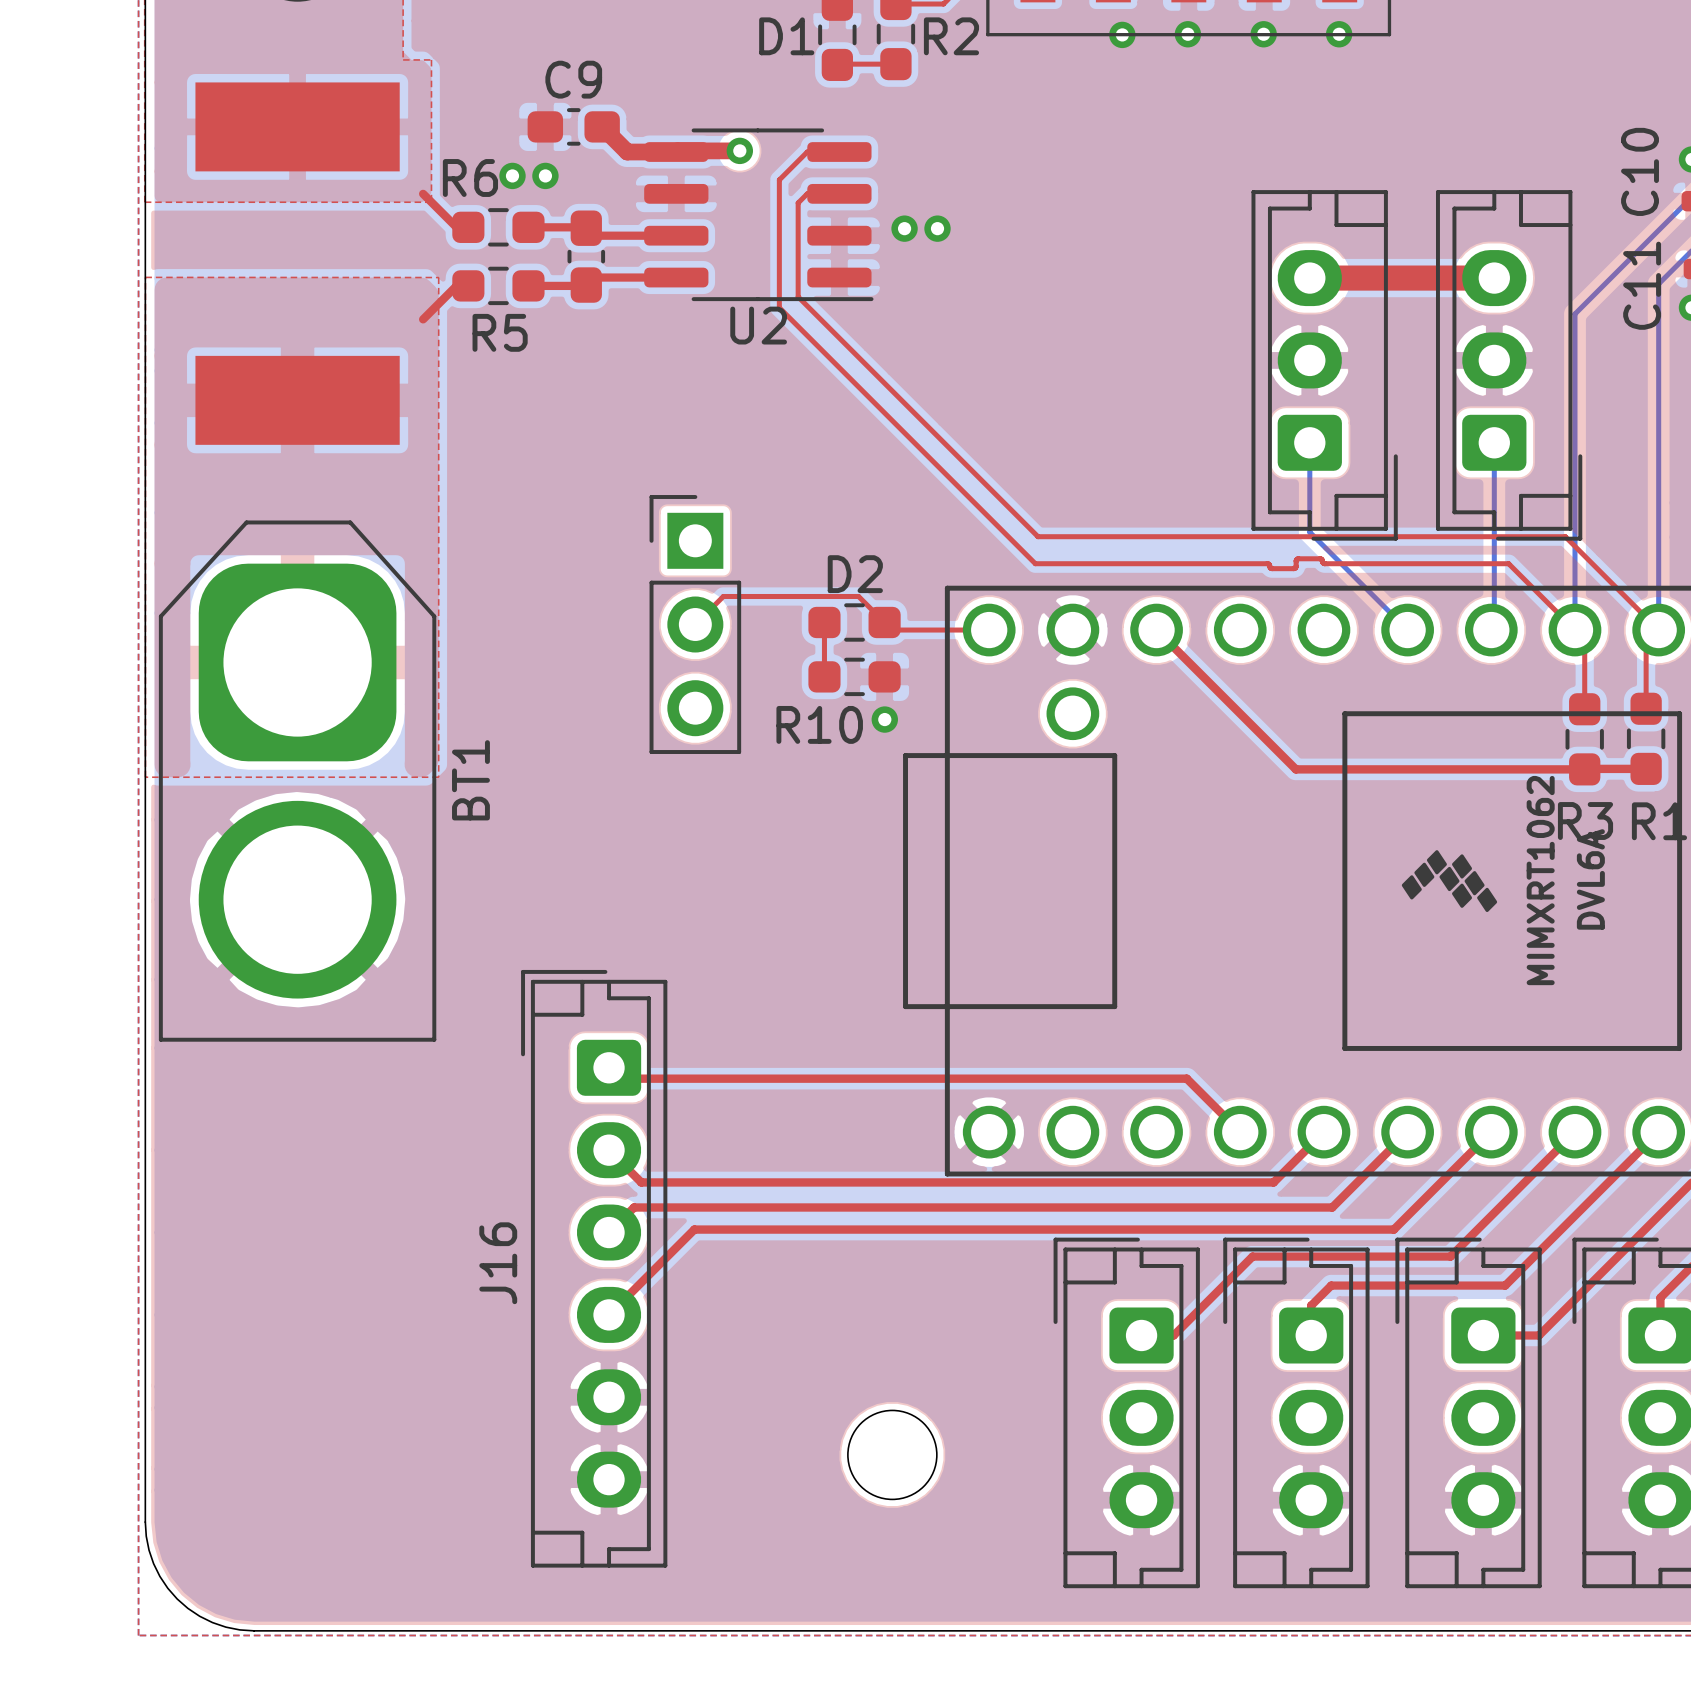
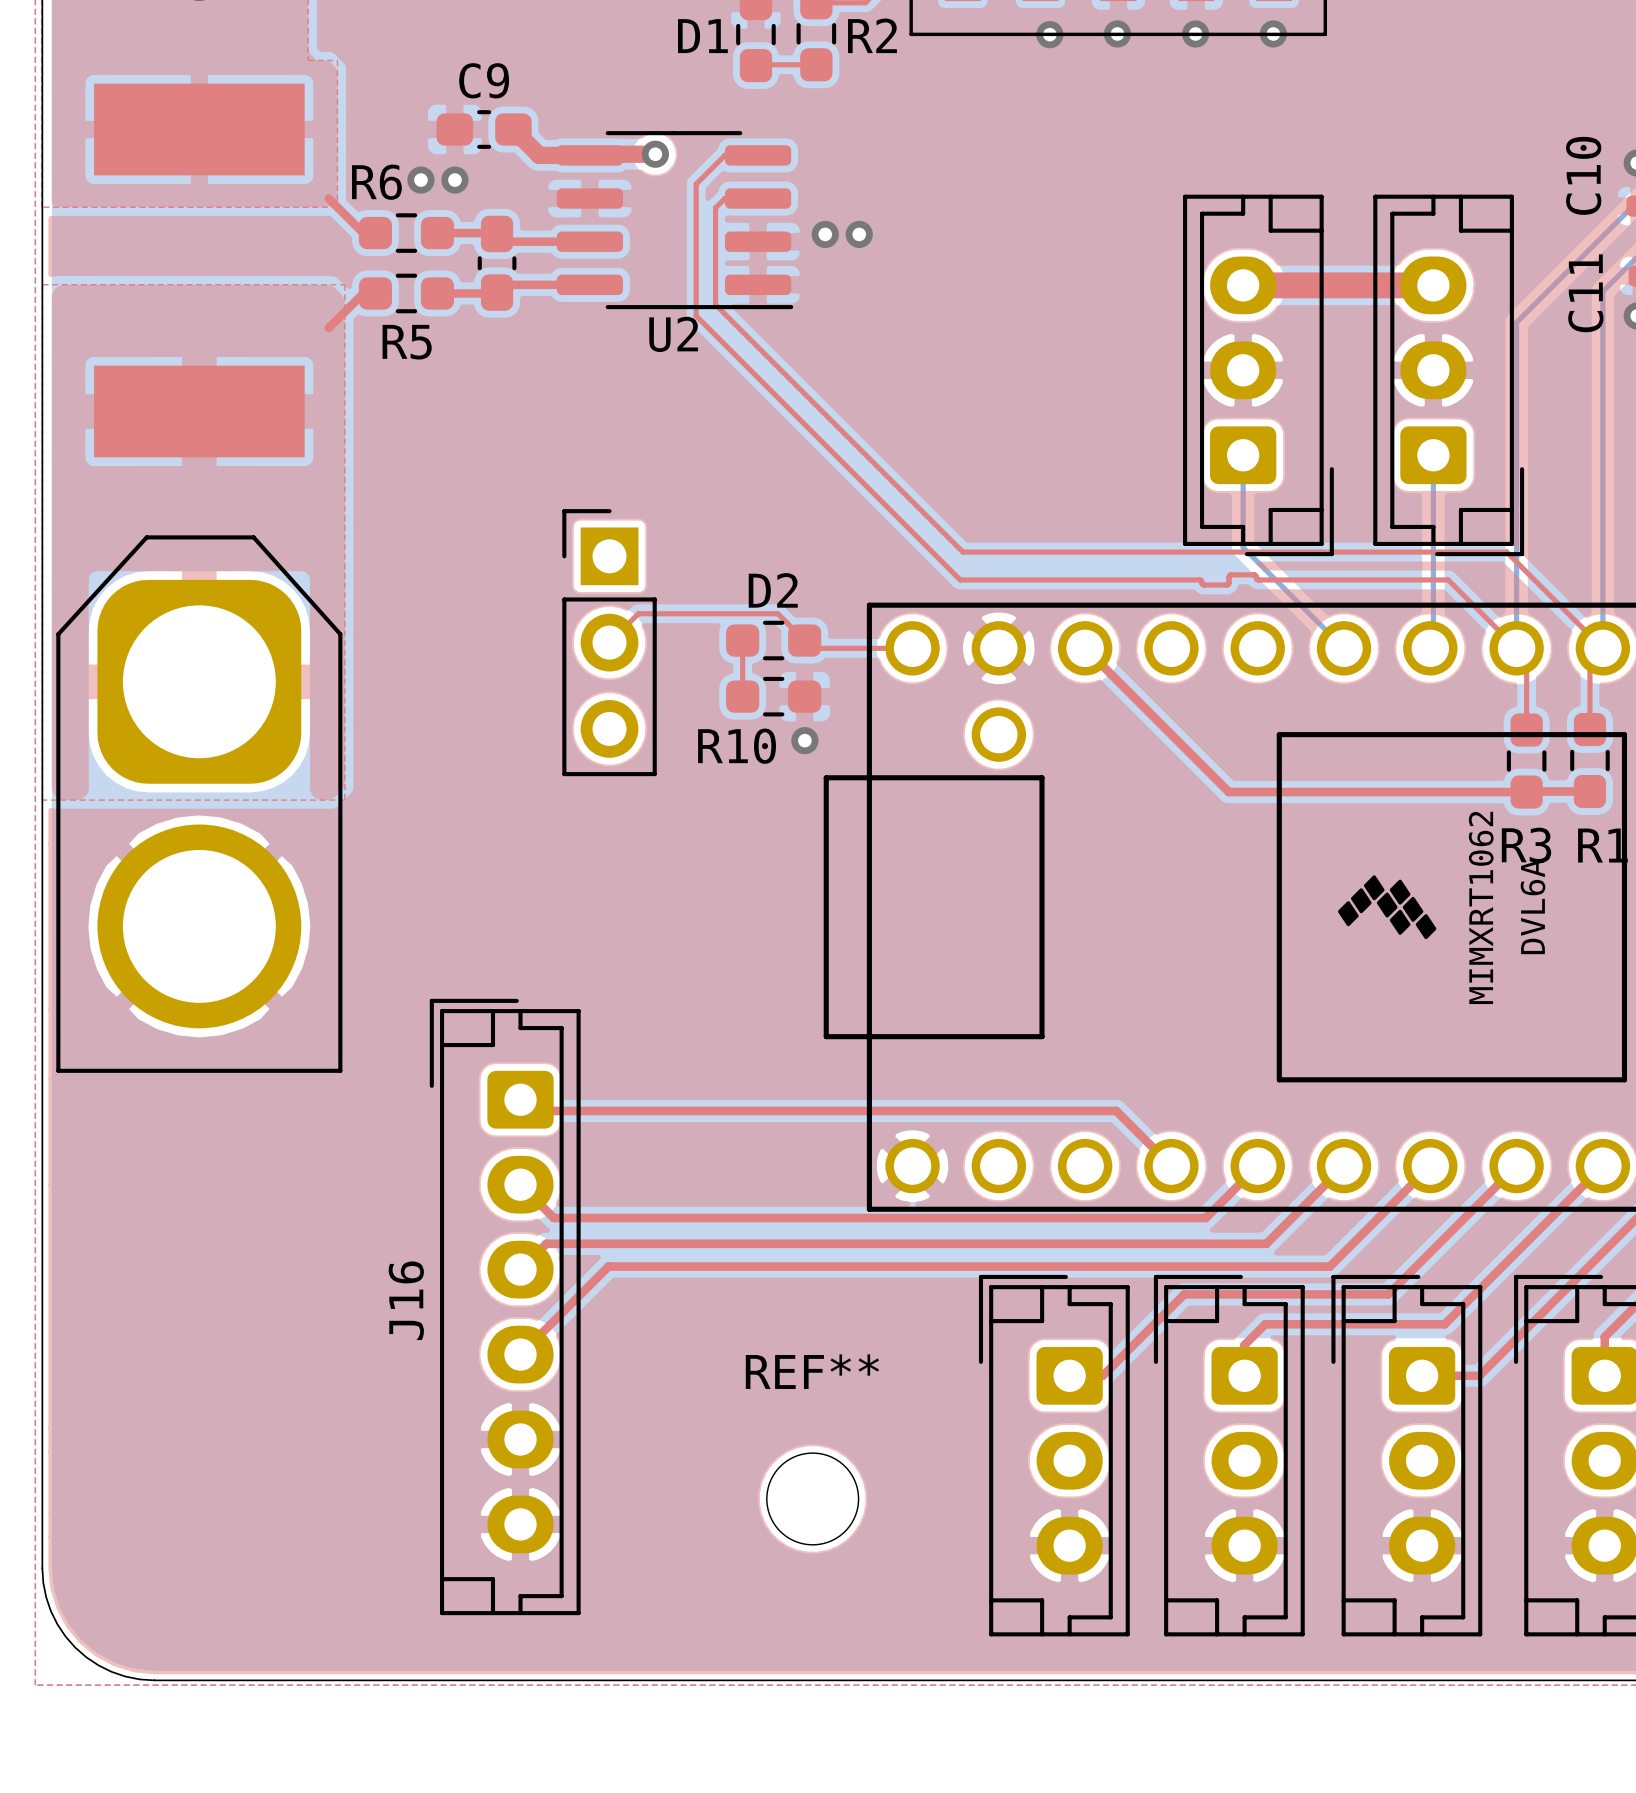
BT1 name: BT1 (470, 780) -> none
REF** name: none -> REF** (812, 1371)

